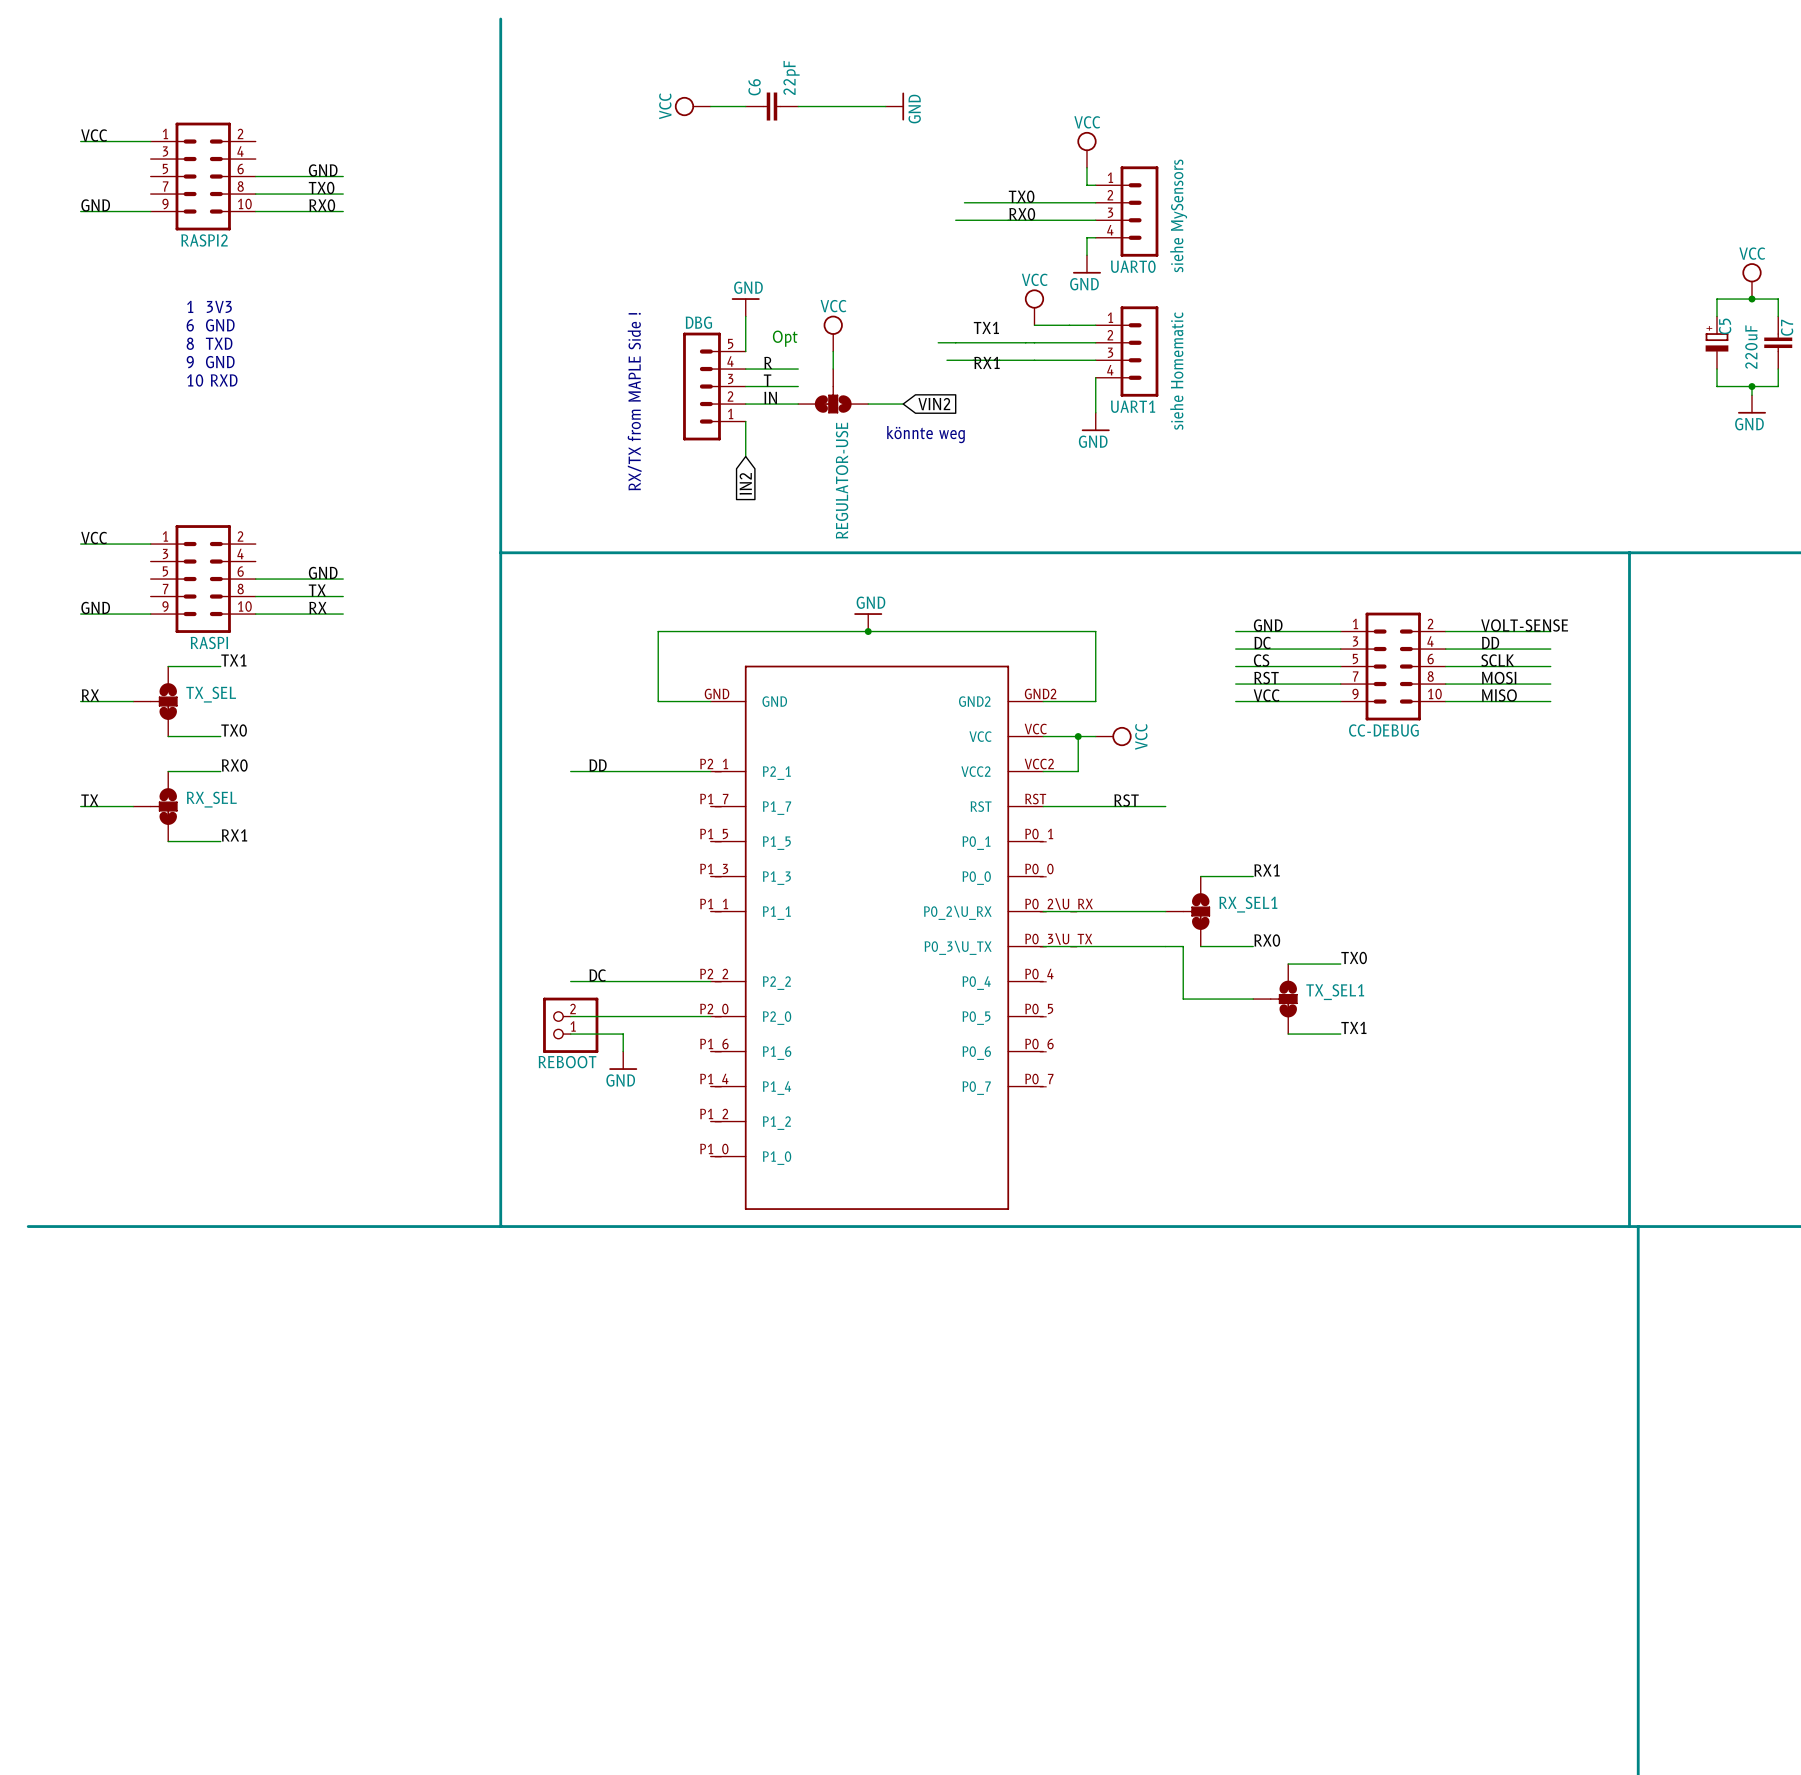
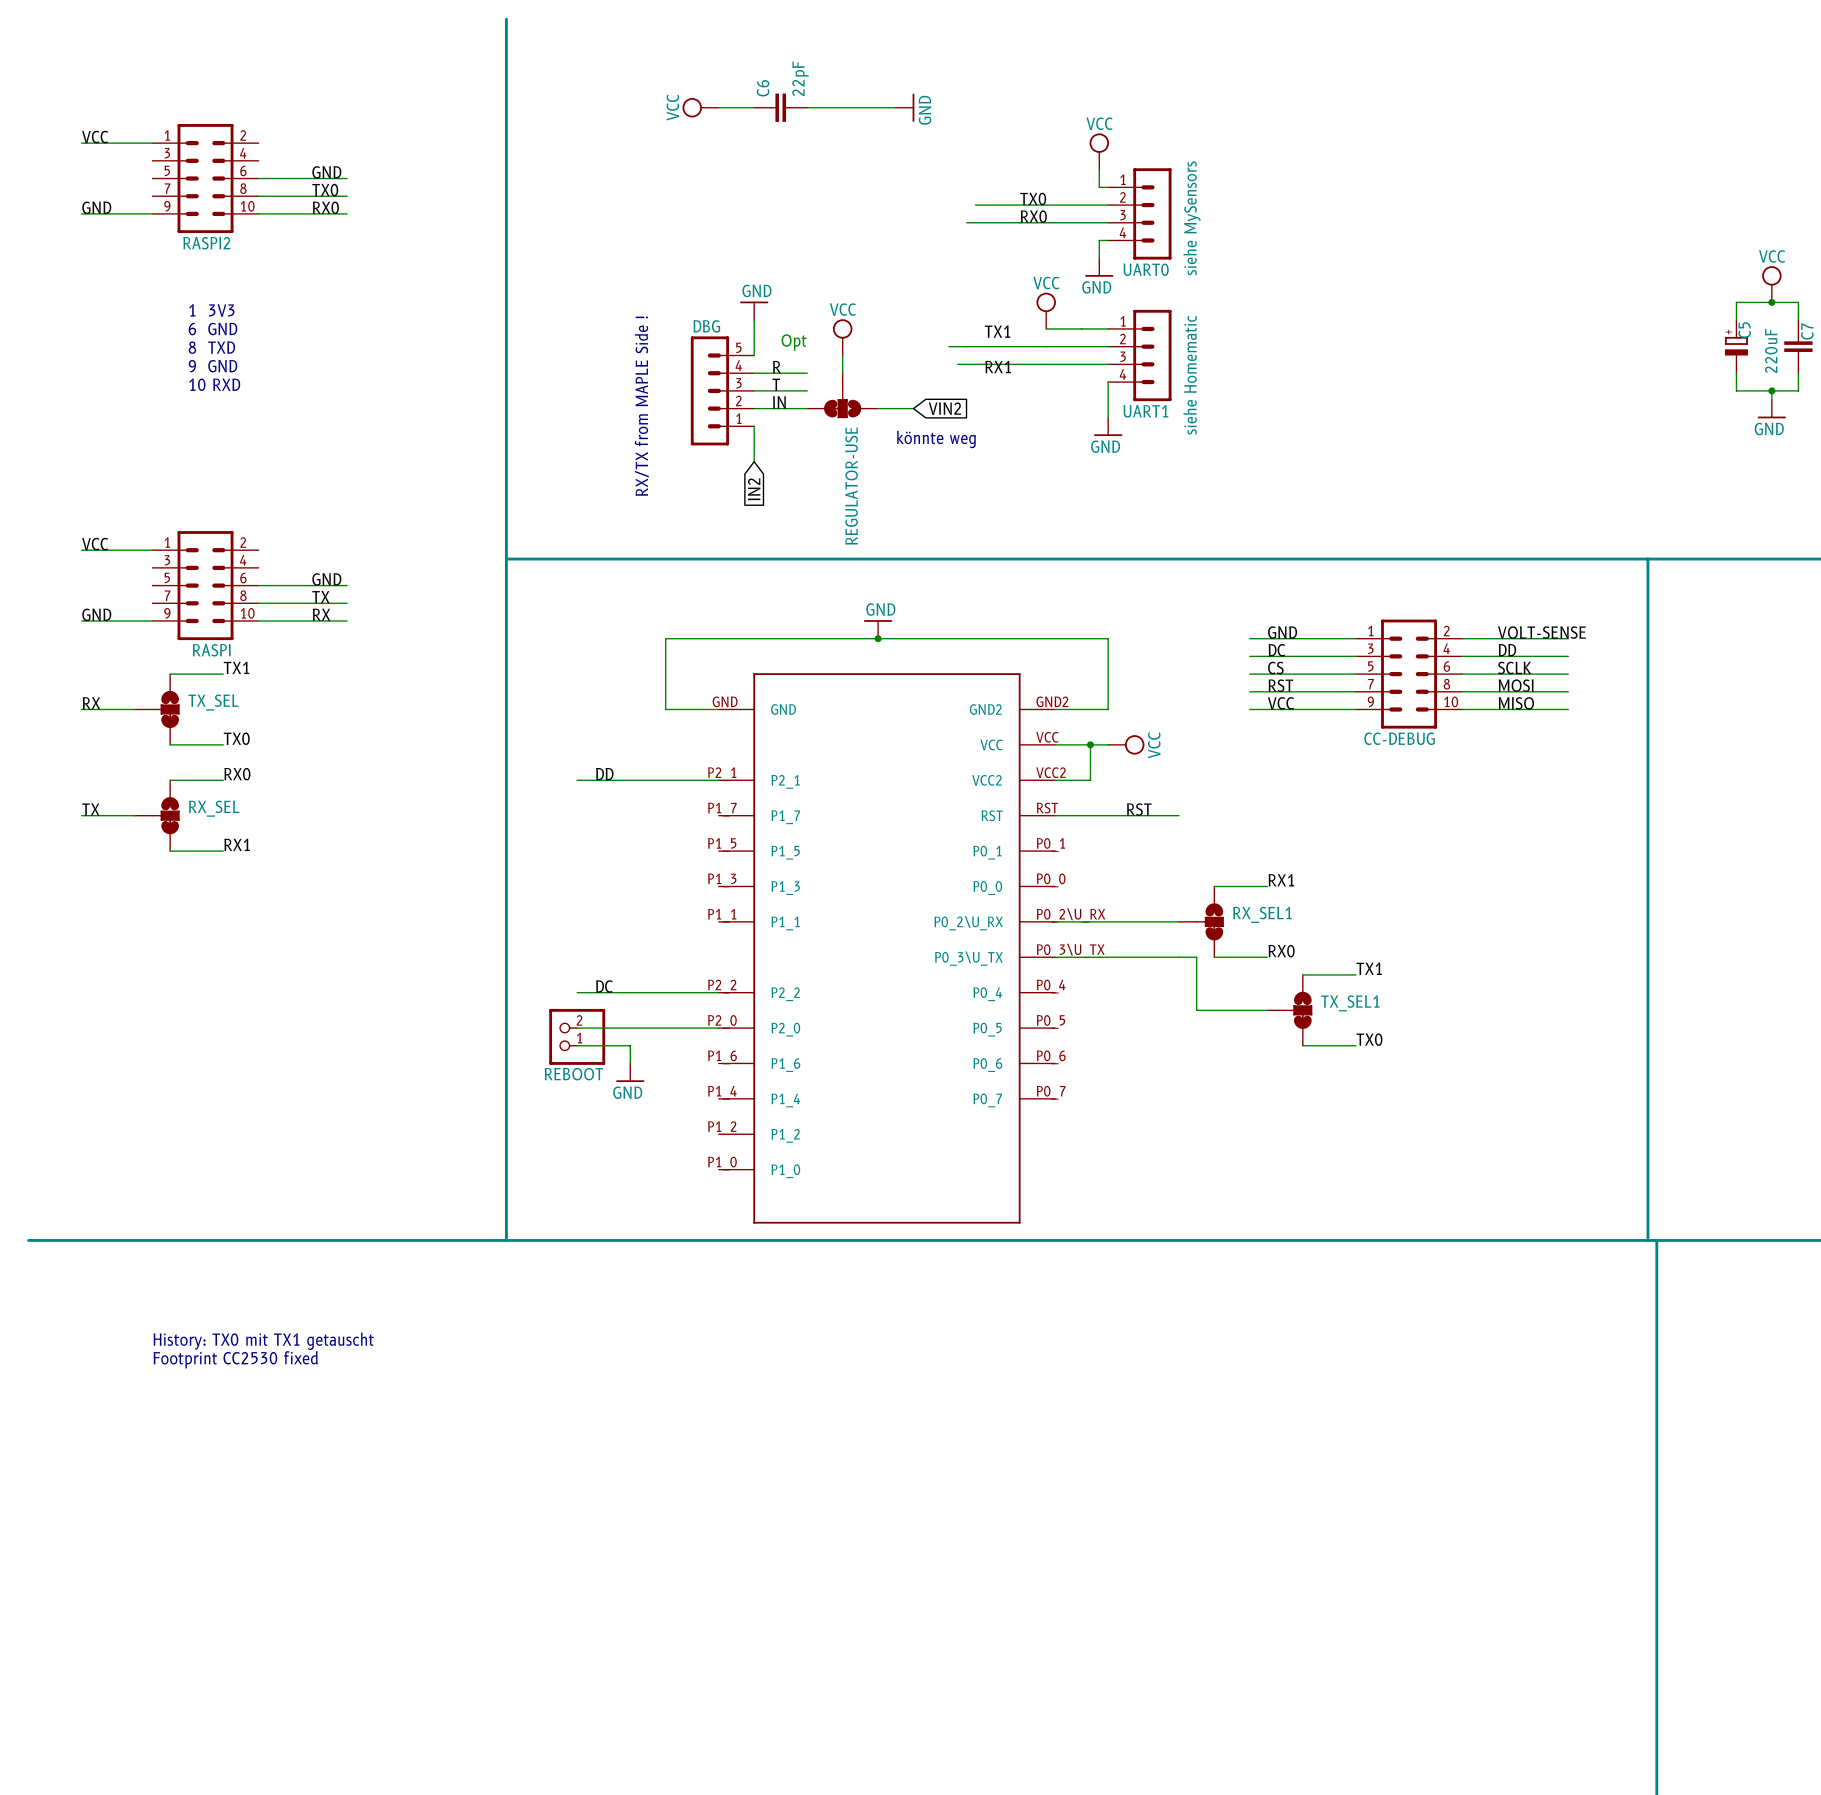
label: TX0 (1354, 957) -> TX1 (1369, 968)
label: TX1 (1353, 1027) -> TX0 (1369, 1039)
text: none -> History: TX0 mit TX1 getauscht (263, 1341)
text: none -> Footprint CC2530 fixed (235, 1359)

